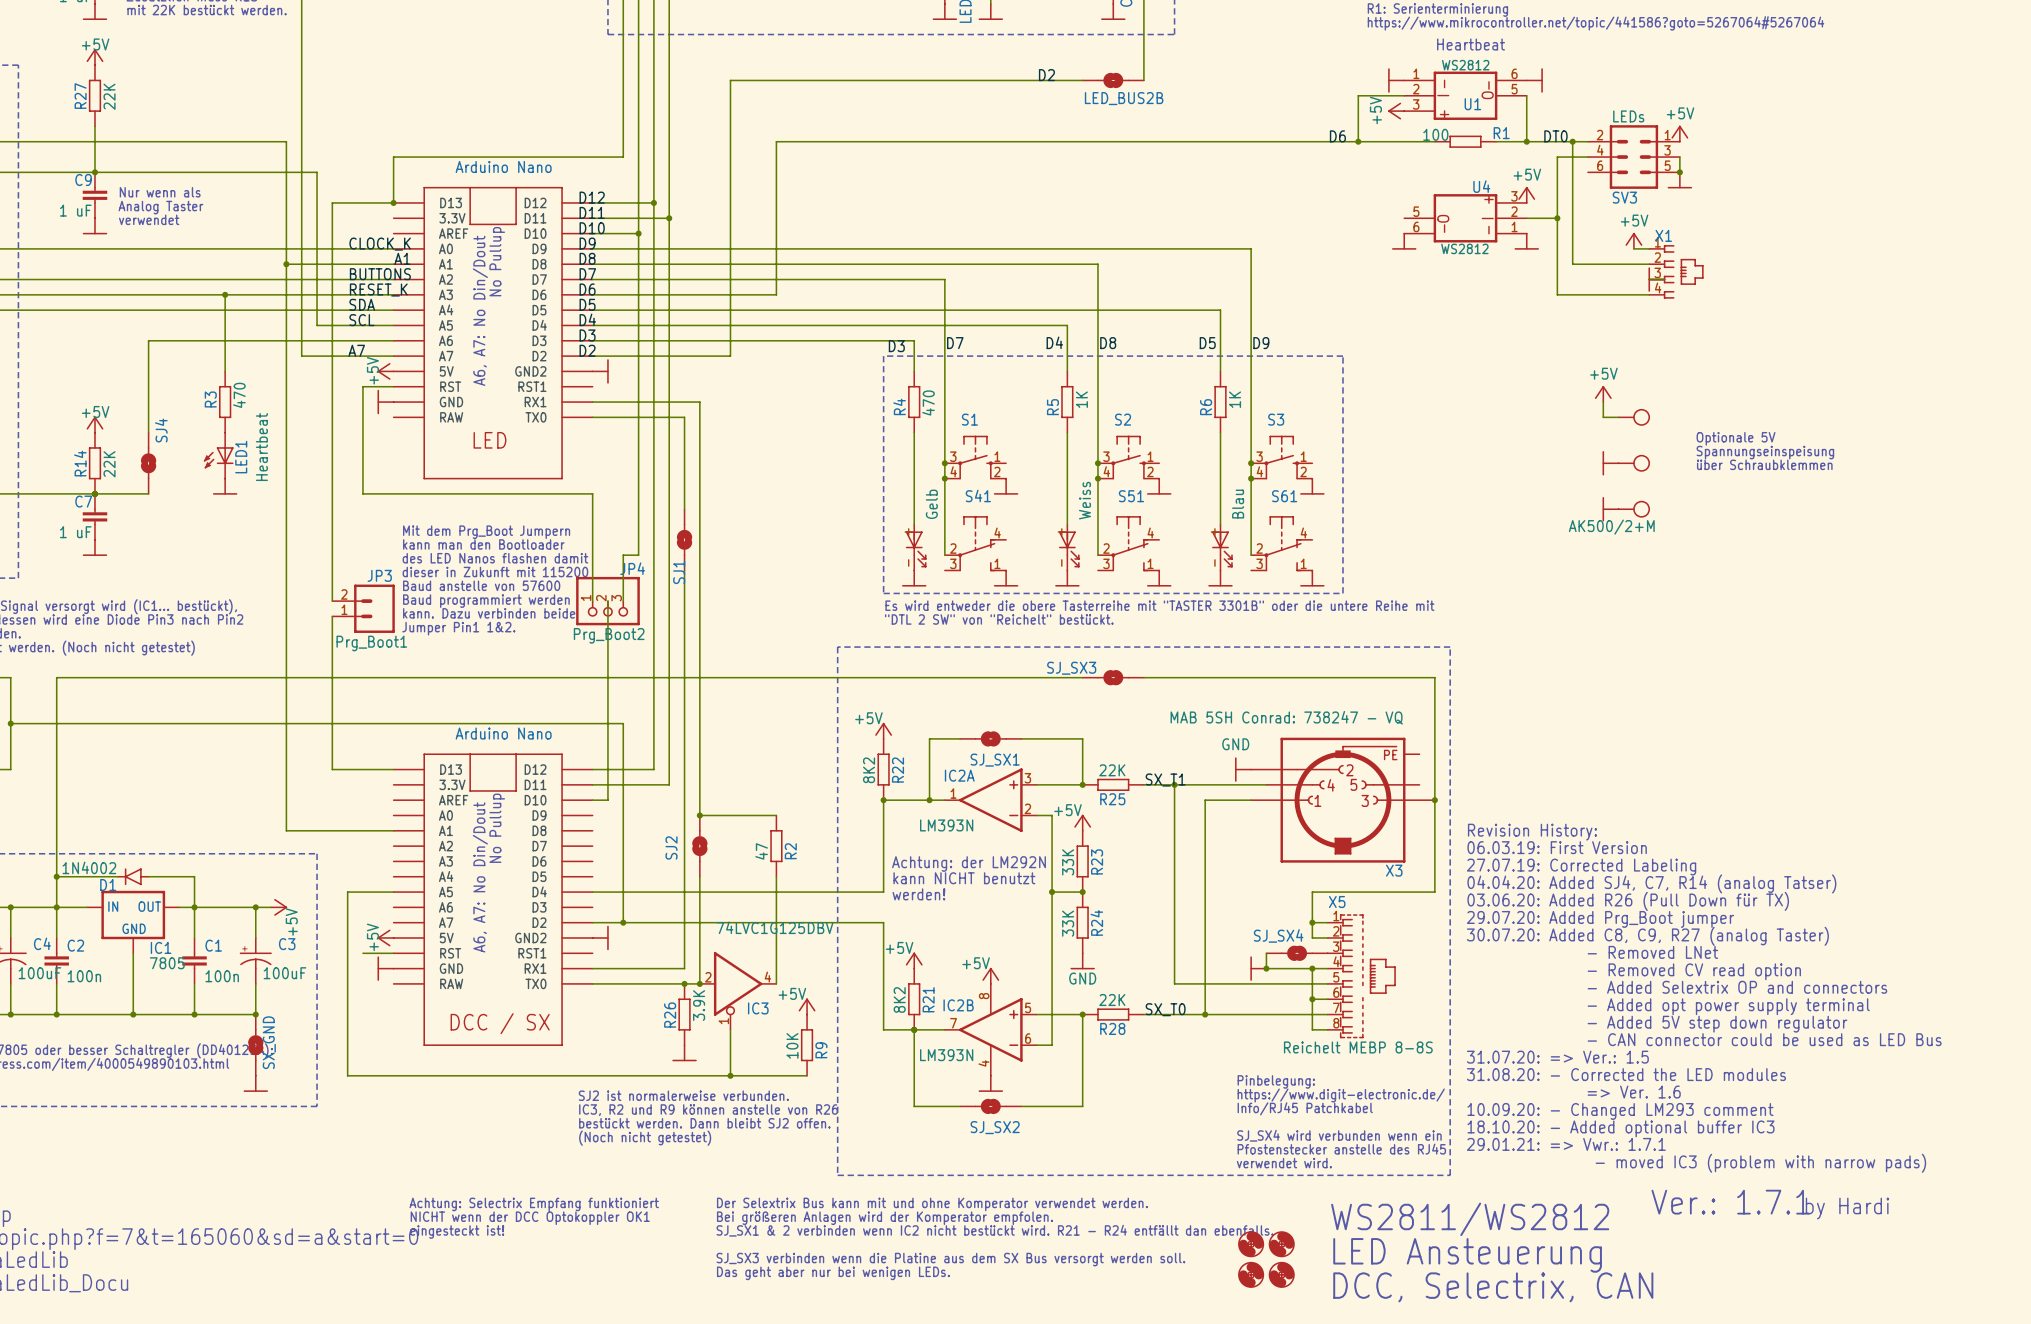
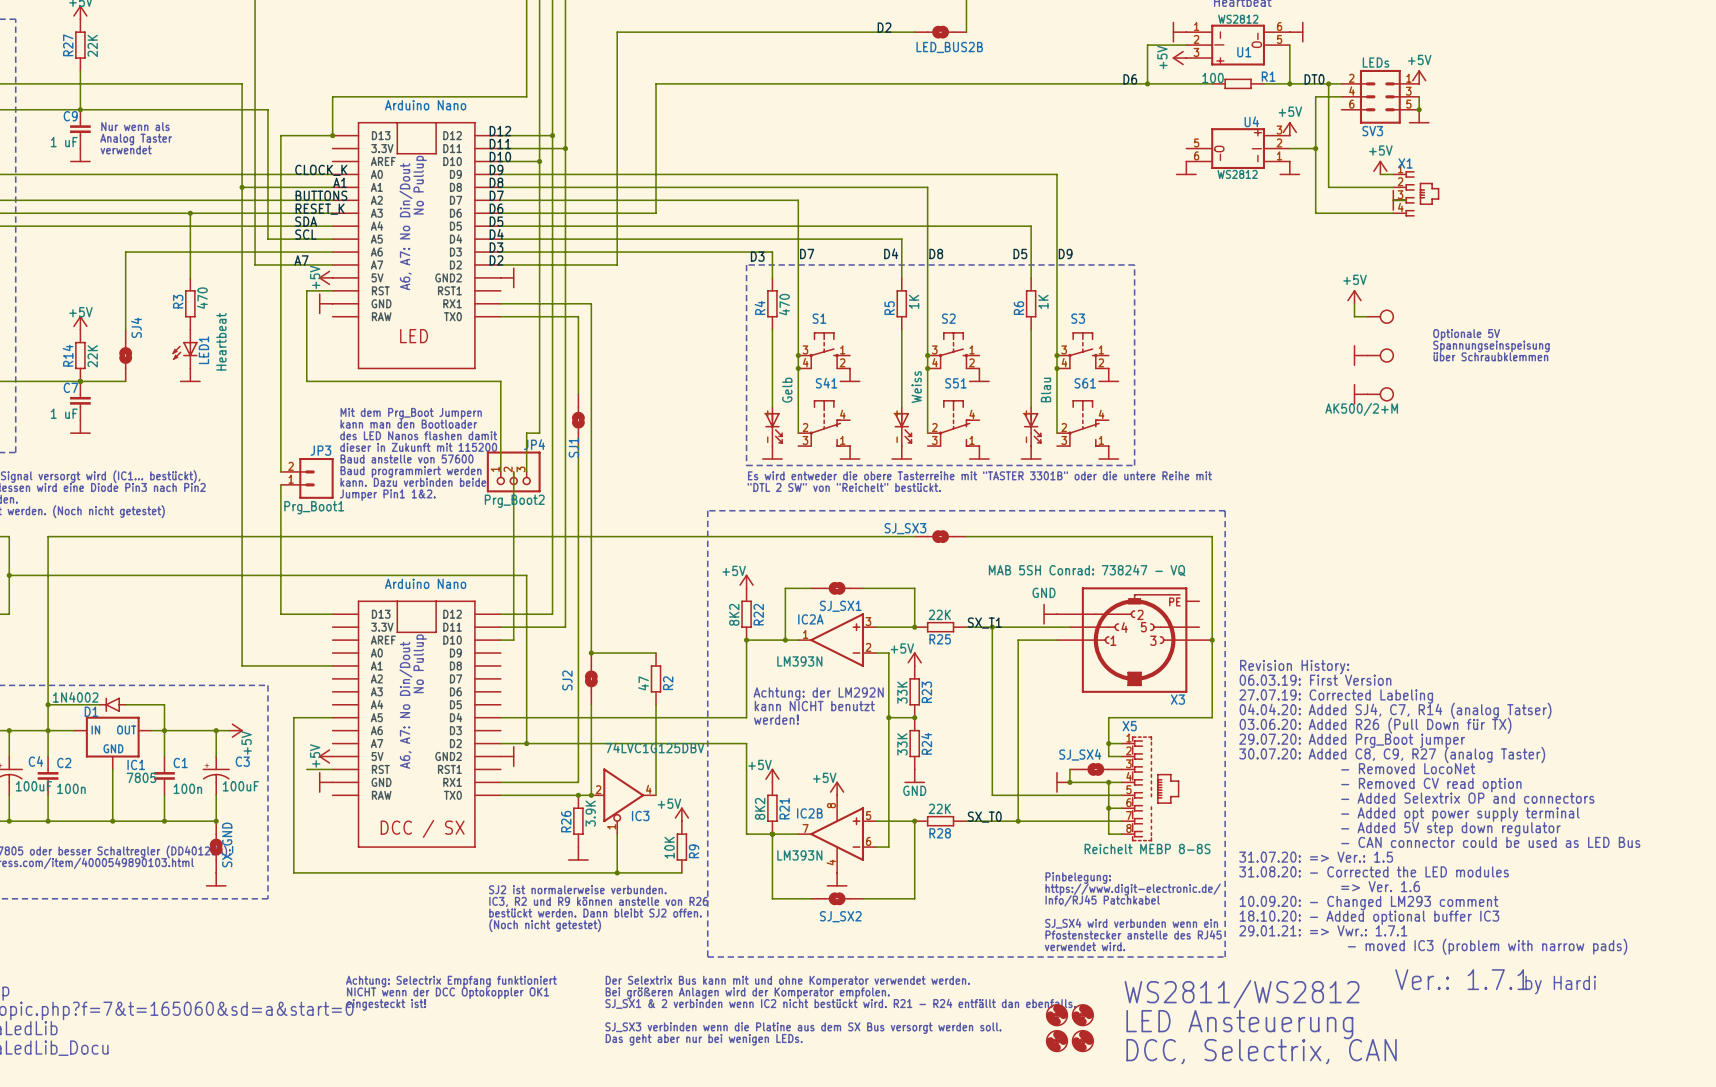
text: - Removed LNet (1652, 952) -> - Removed LocoNet (1408, 768)

